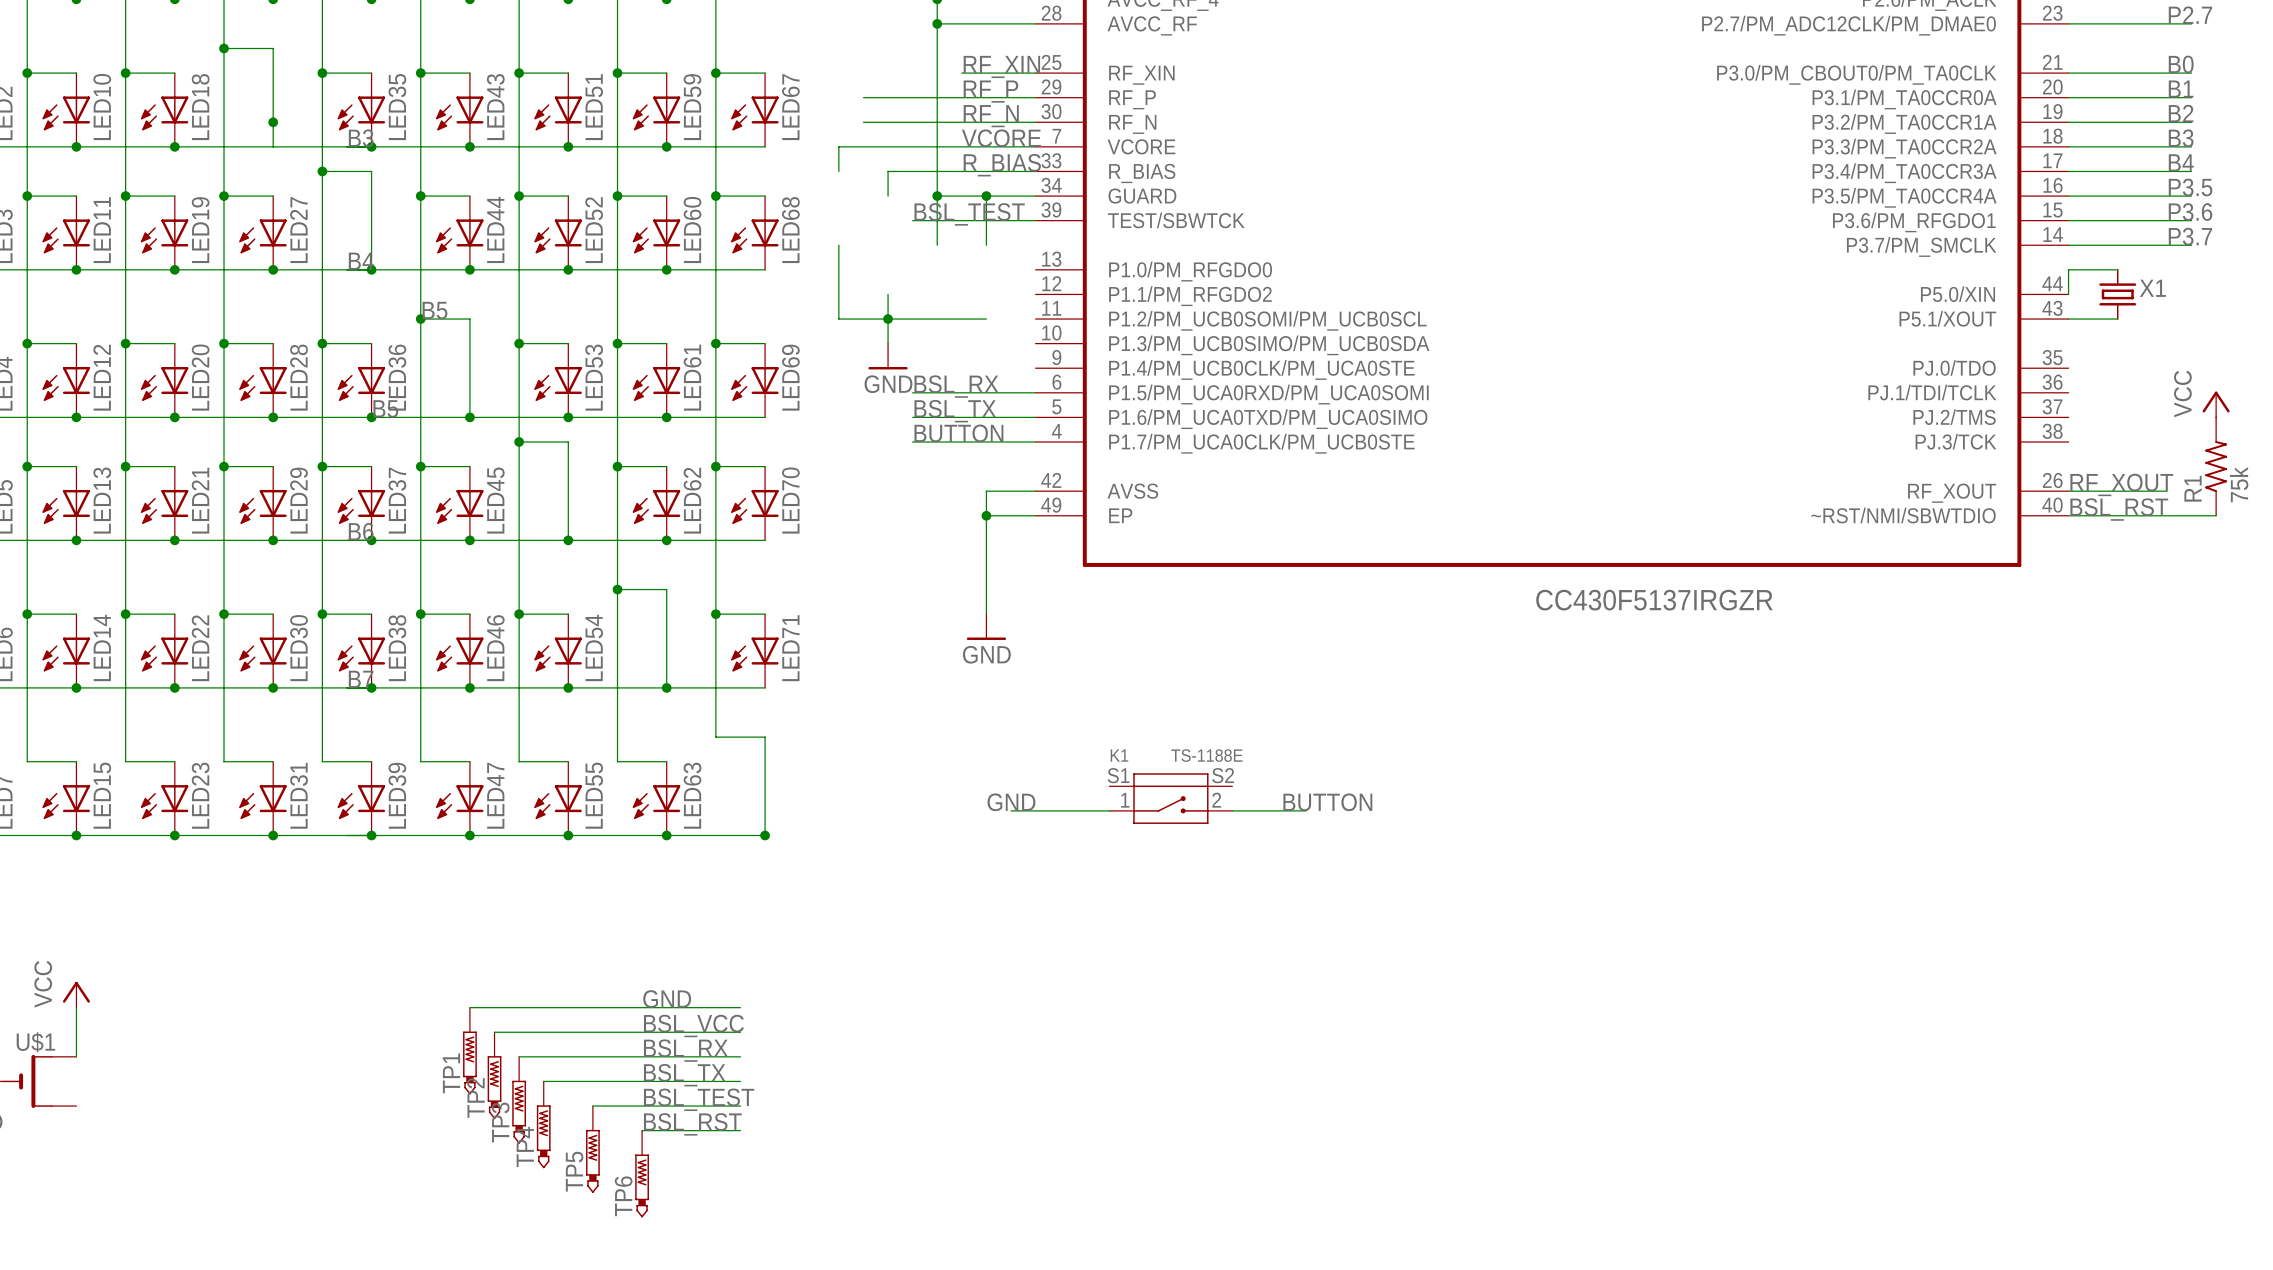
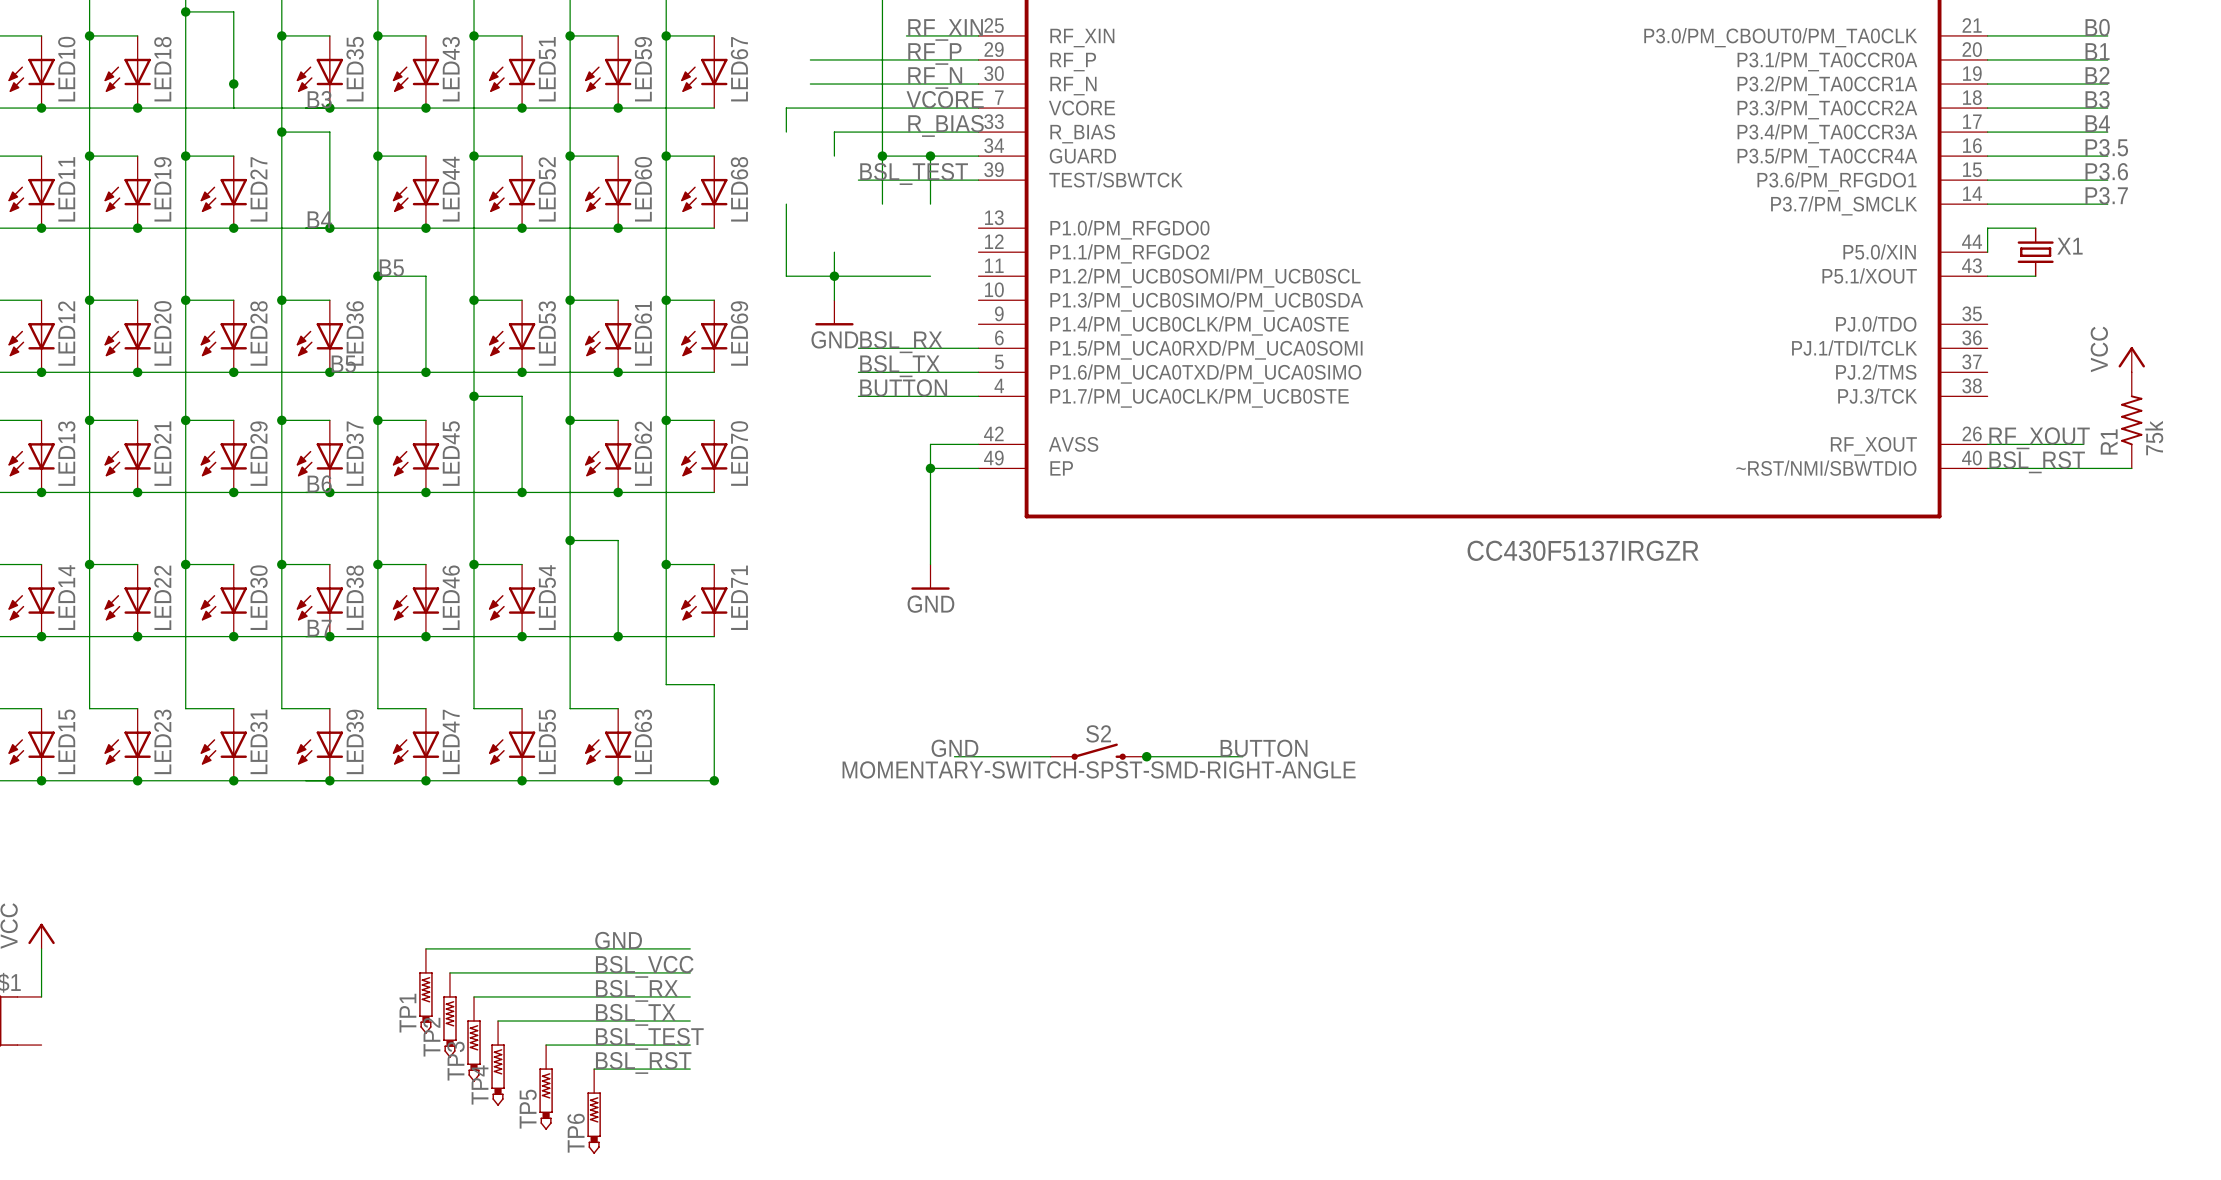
K1: TS-1188E (1170, 798) -> none
S2: none -> MOMENTARY-SWITCH-SPST-SMD-RIGHT-ANGLE (1098, 751)
junction: none -> (1146, 756)

